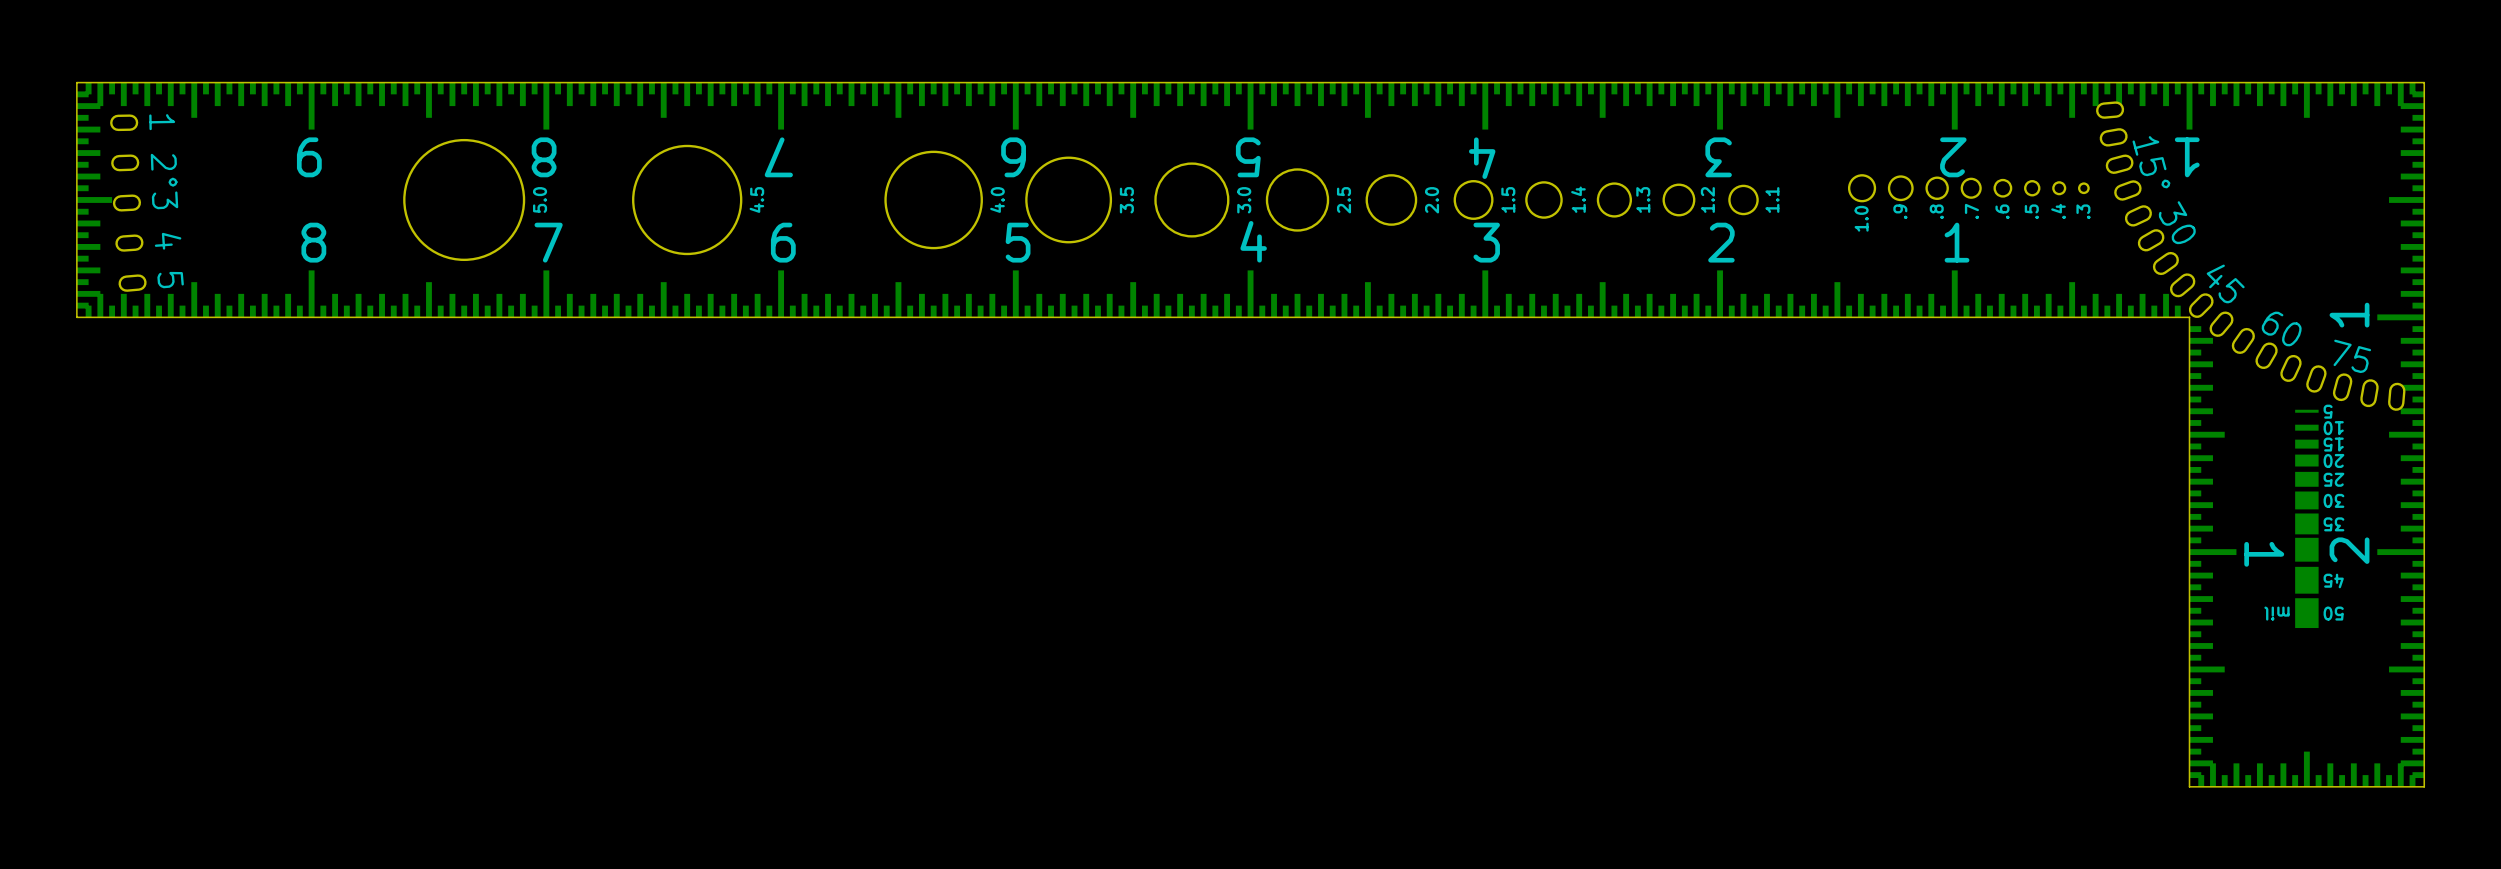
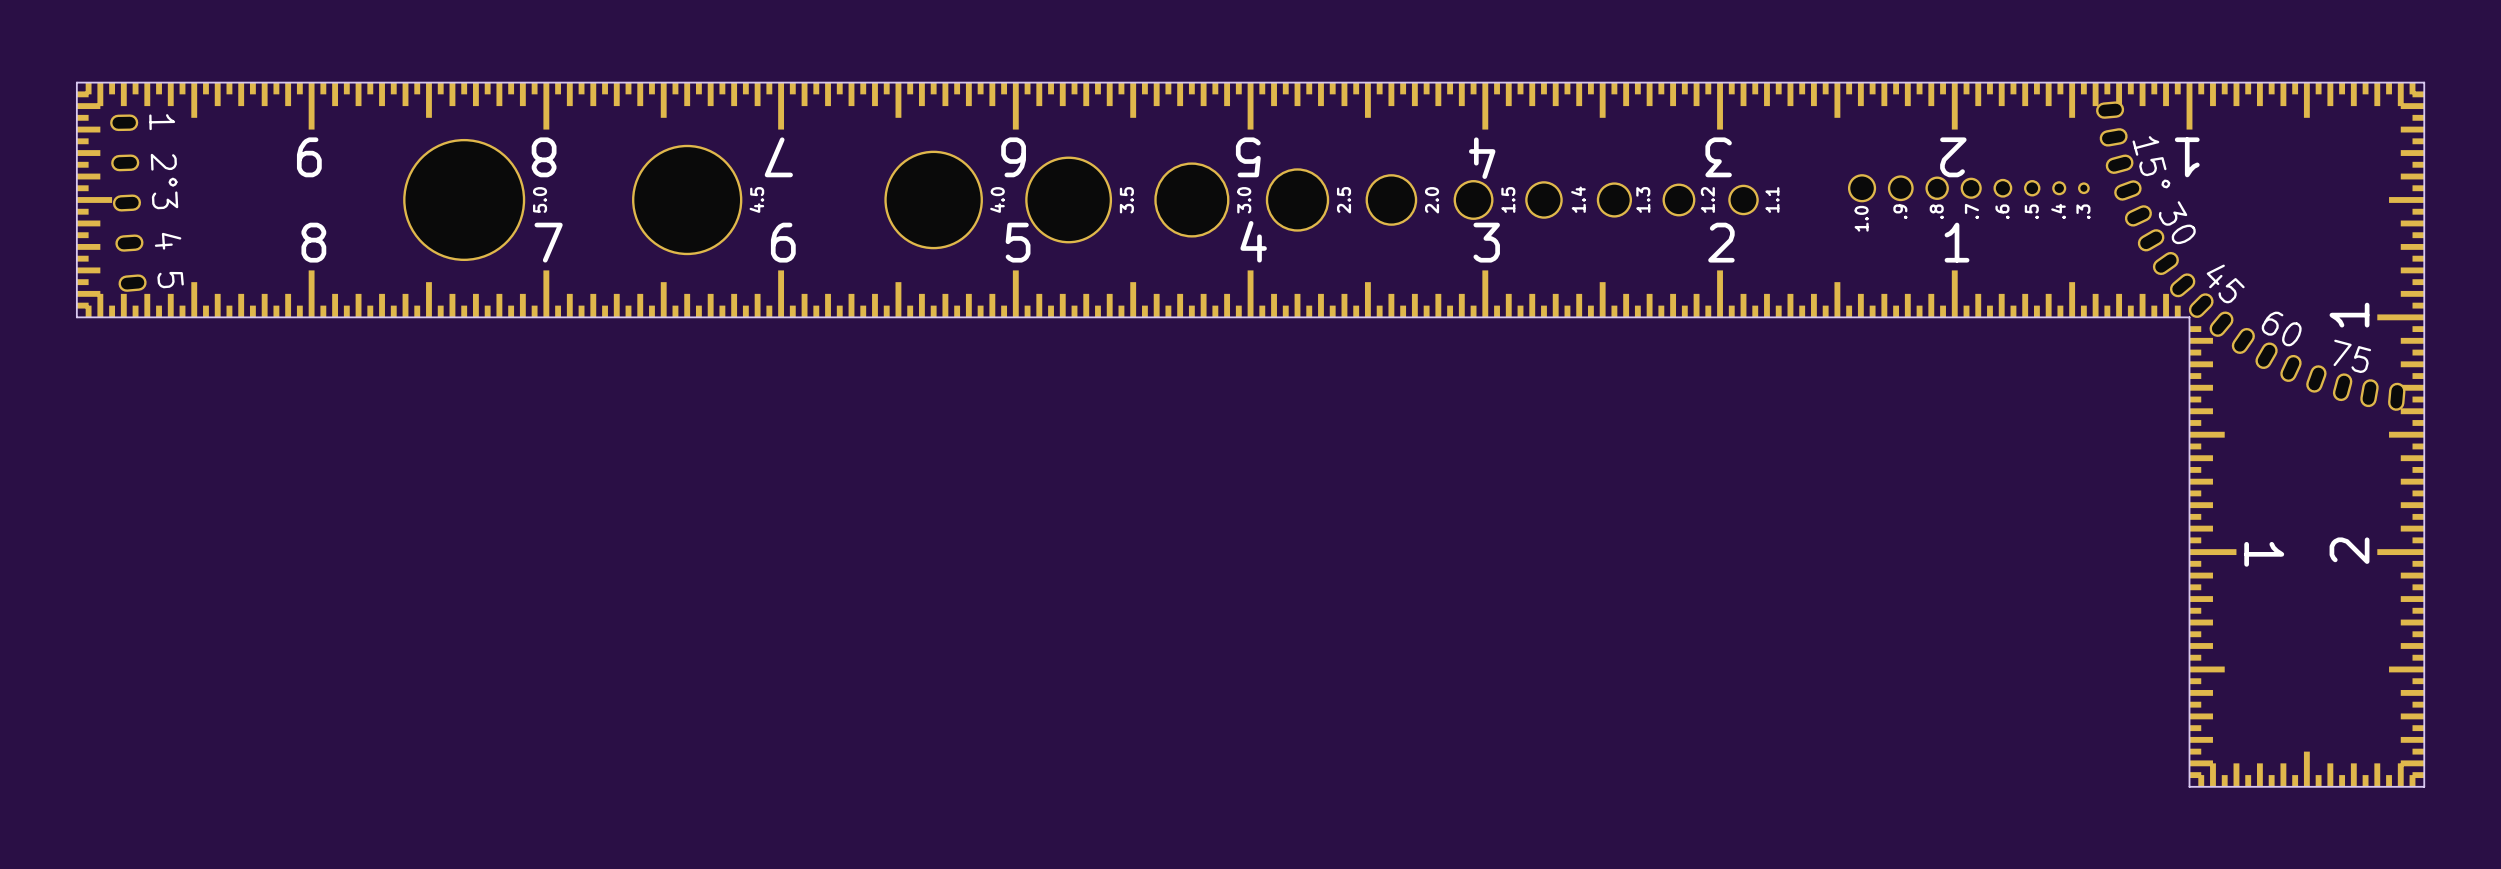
part: (2306, 518) -> none

